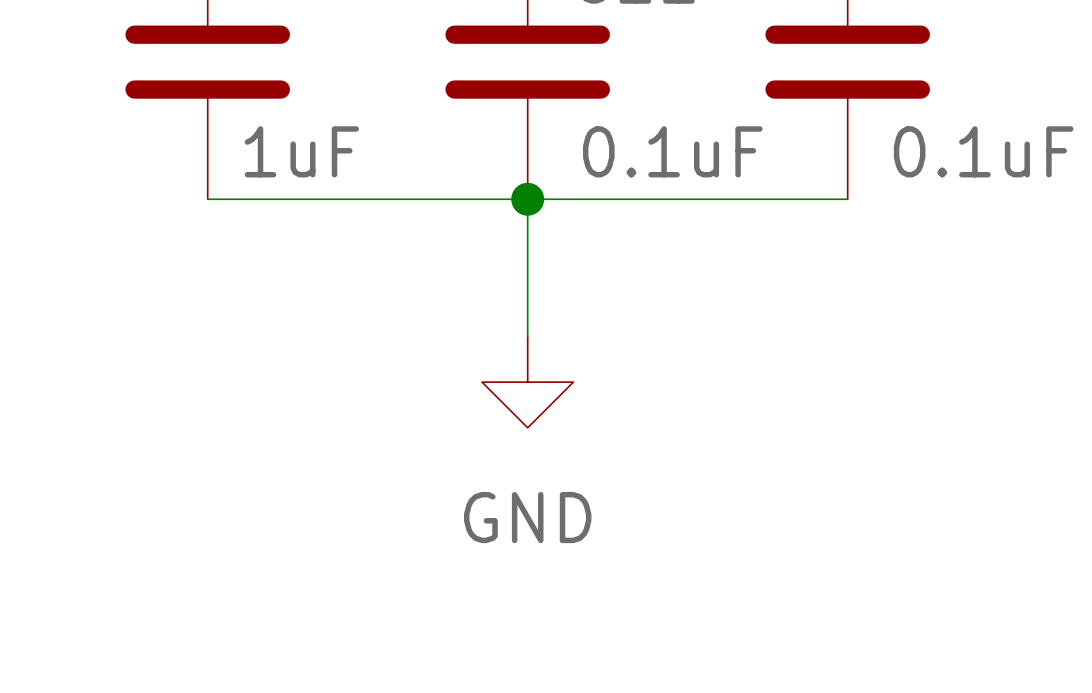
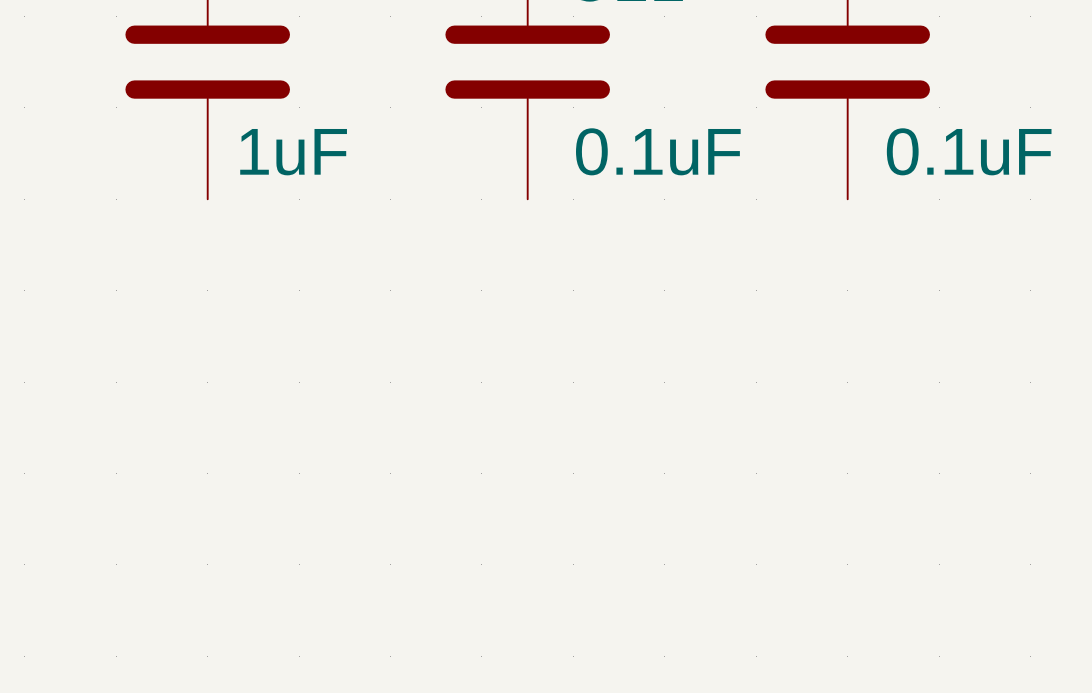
wire: (207, 199) (847, 199) -> none
wire: (527, 199) (527, 336) -> none
junction: (527, 199) -> none
power symbol: GND (527, 382) -> none

